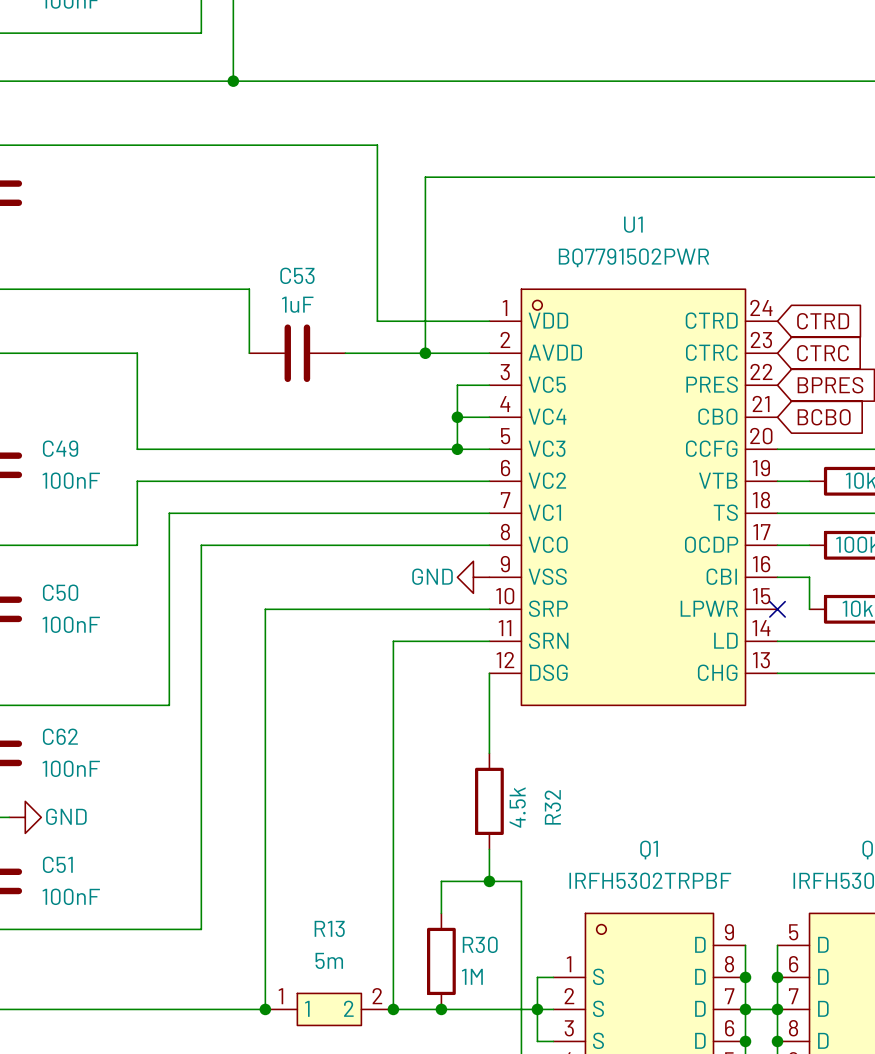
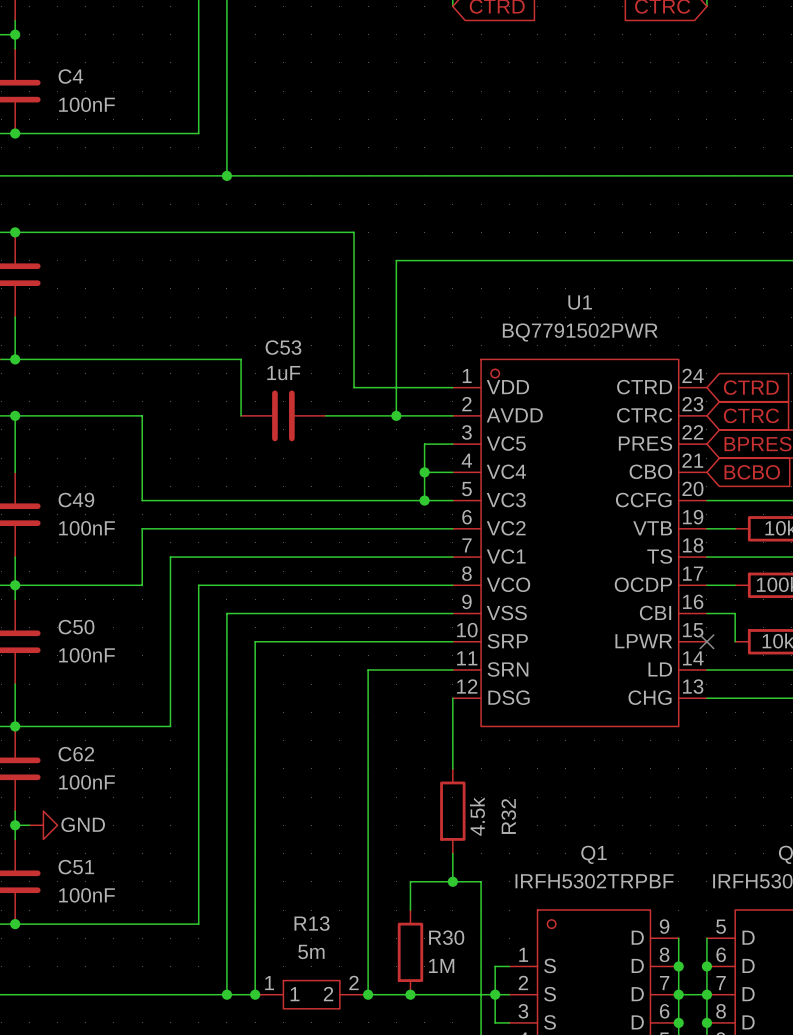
power symbol: GND (473, 577) -> none
wire: none -> (452, 613) (226, 613) (226, 994)
junction: none -> (226, 994)

